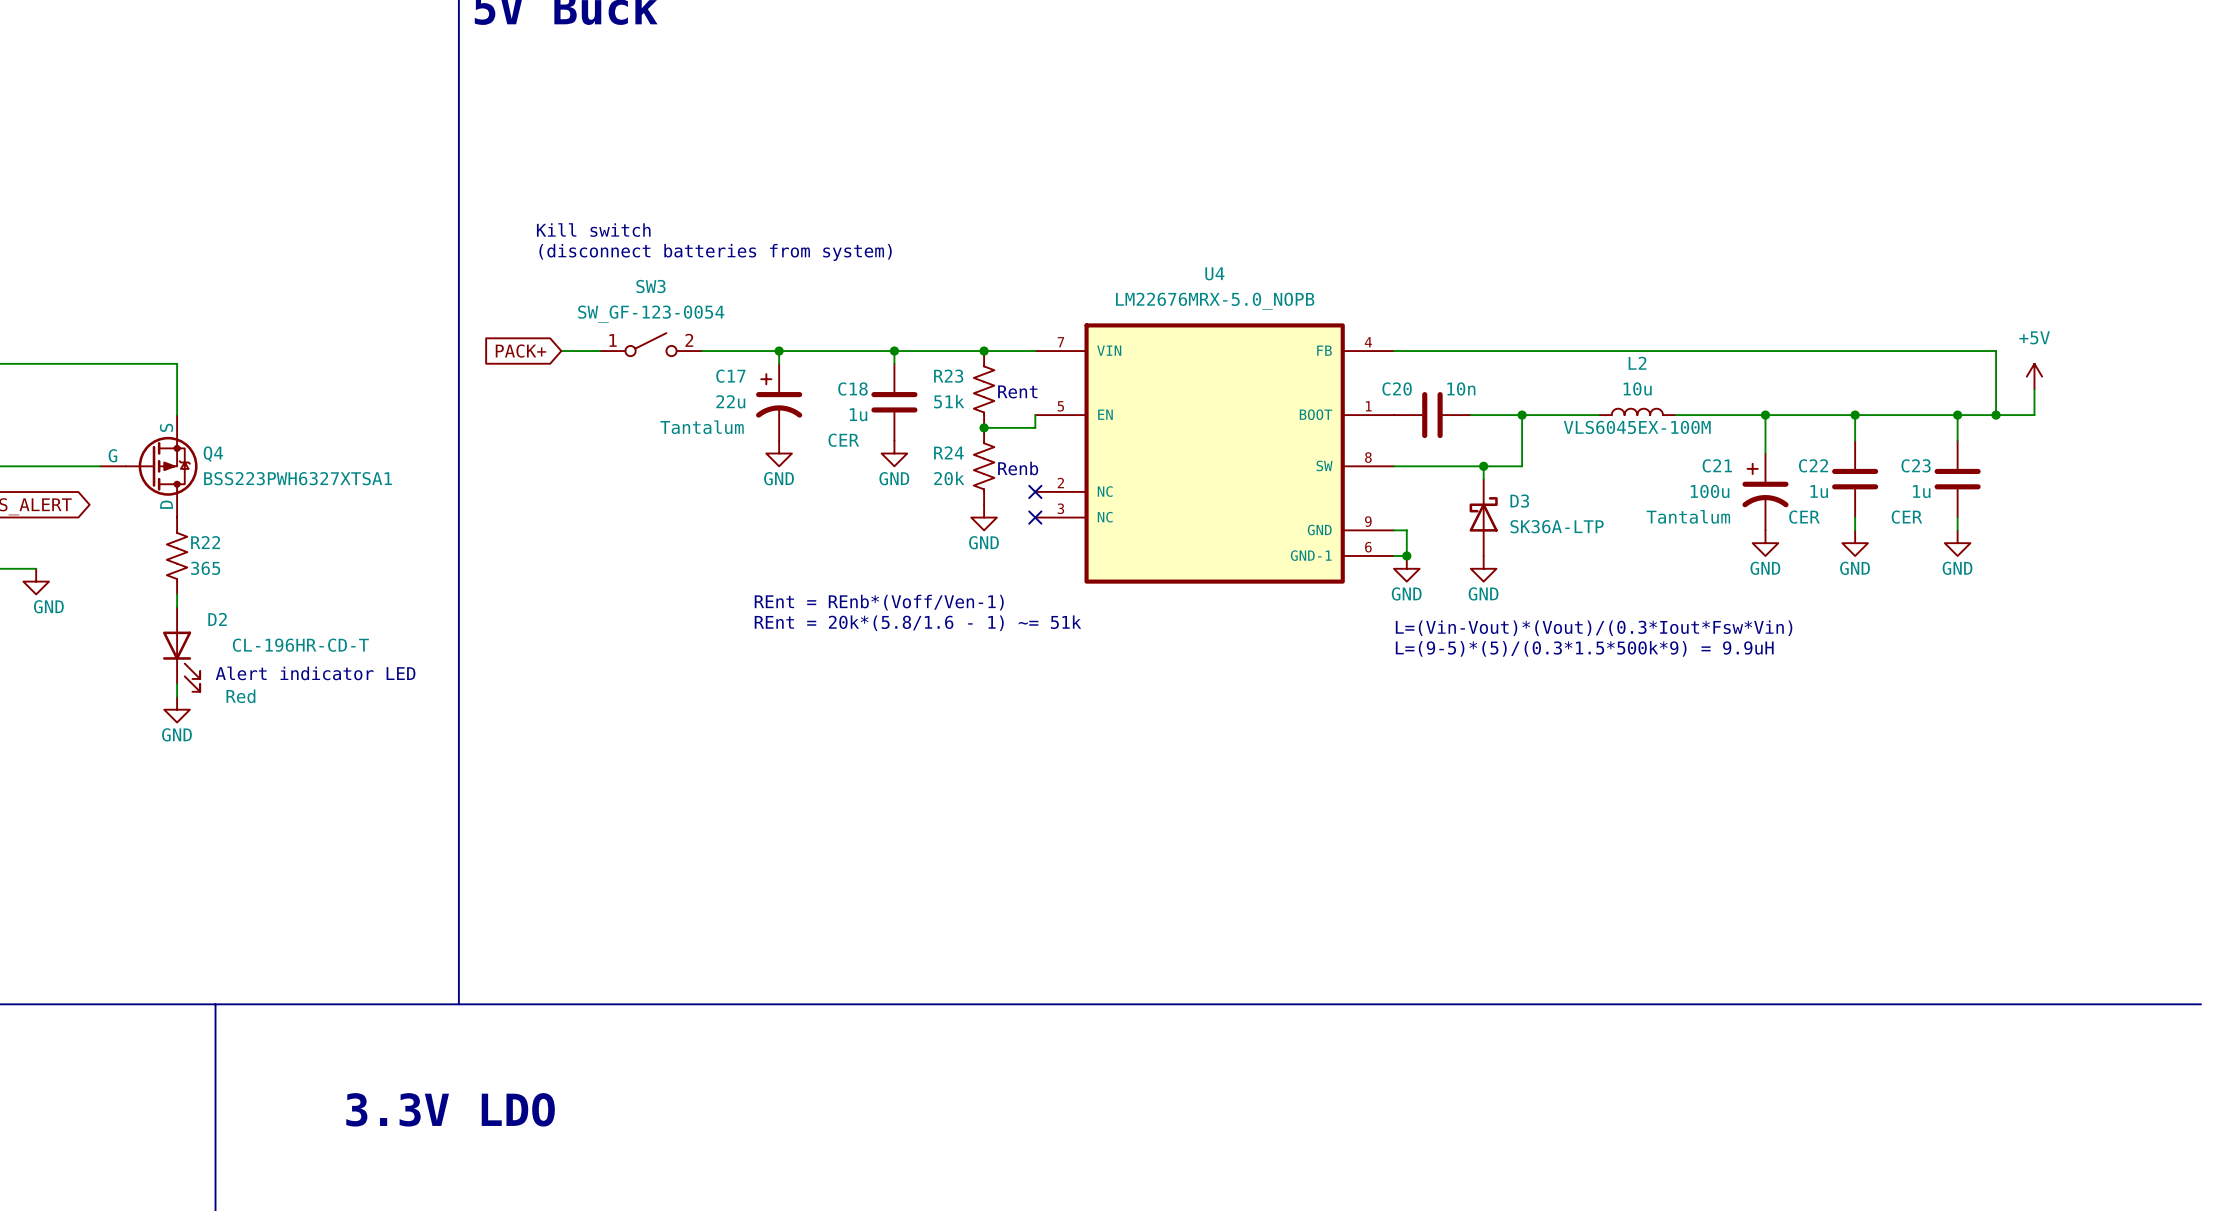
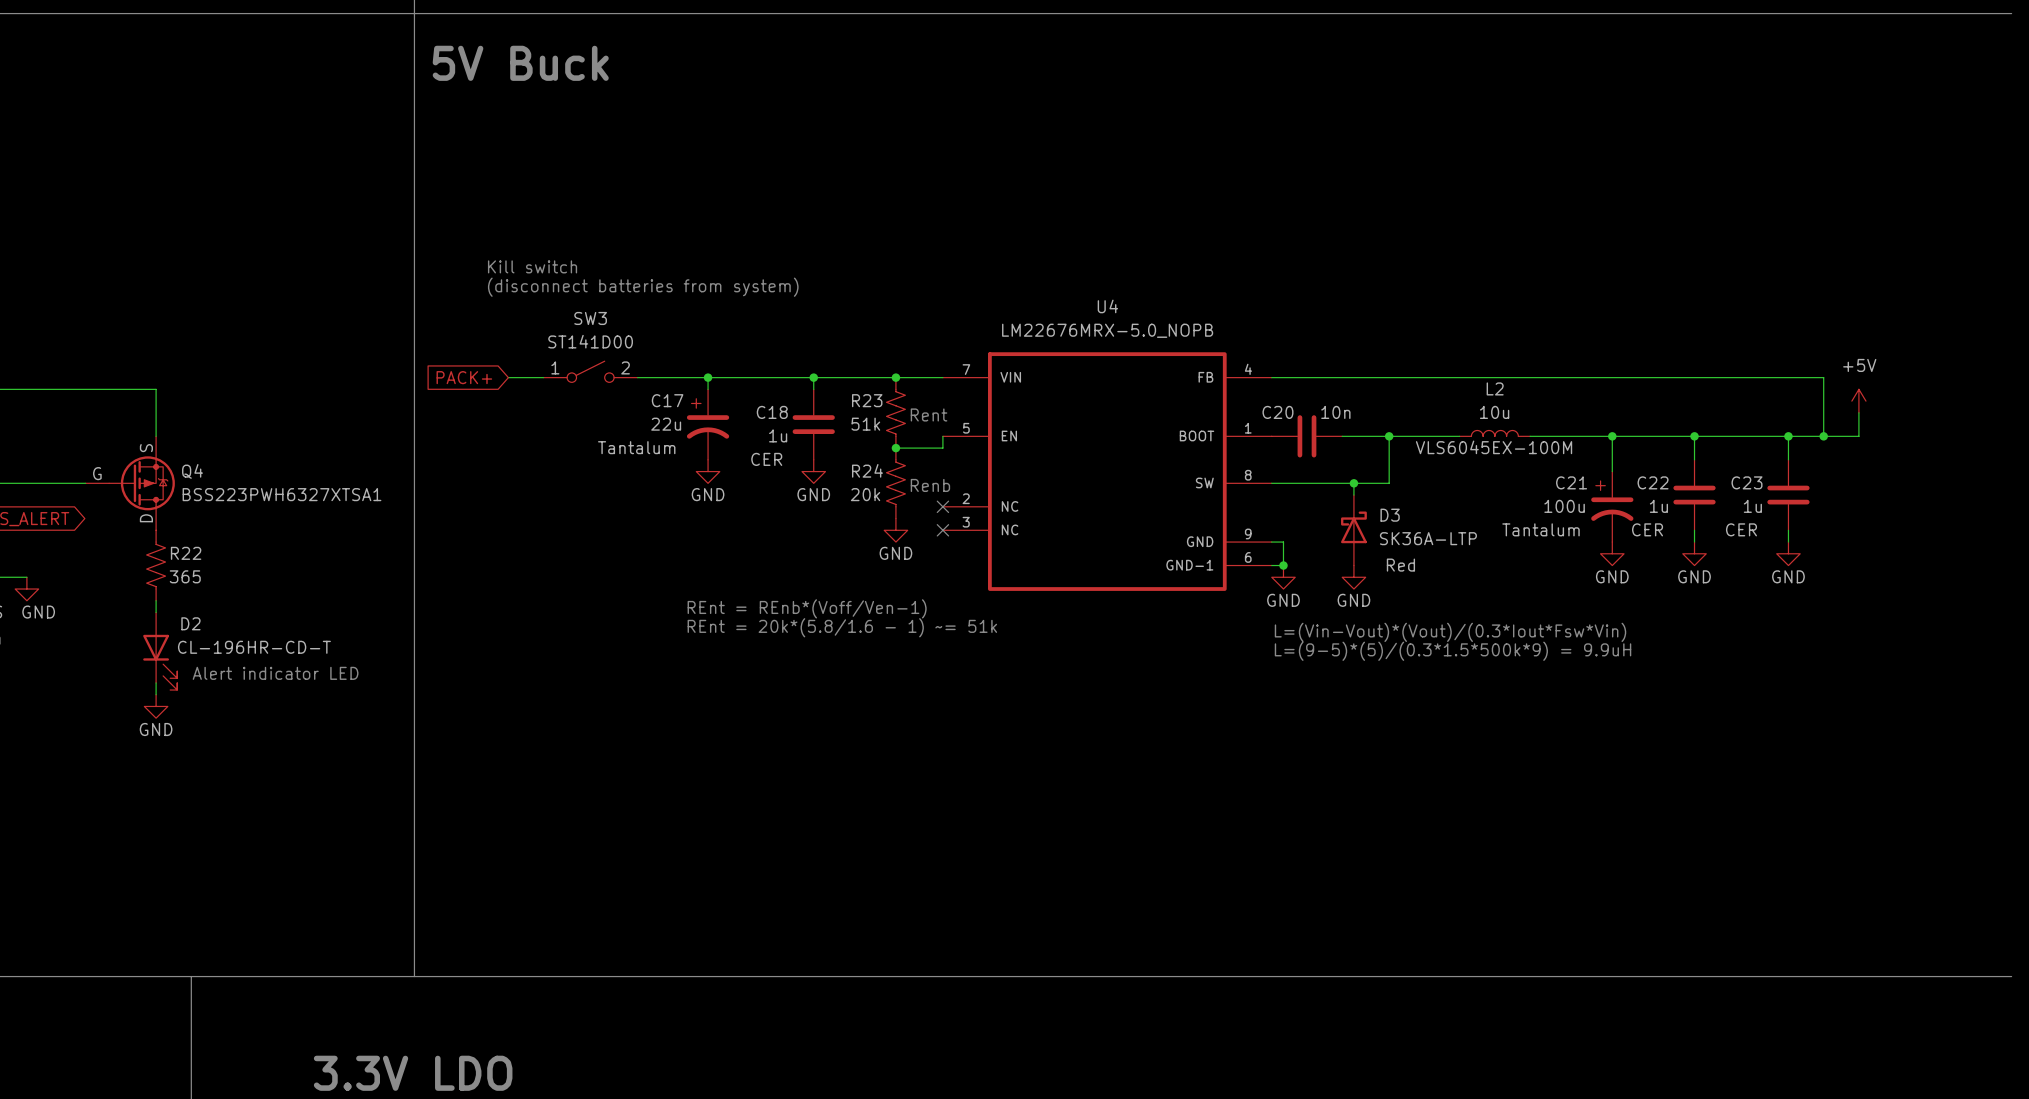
SW3 value: SW_GF-123-0054 (651, 314) -> ST141D00 (590, 341)
D3 text: none -> Red (1400, 565)
D2 text: Red (240, 696) -> none

